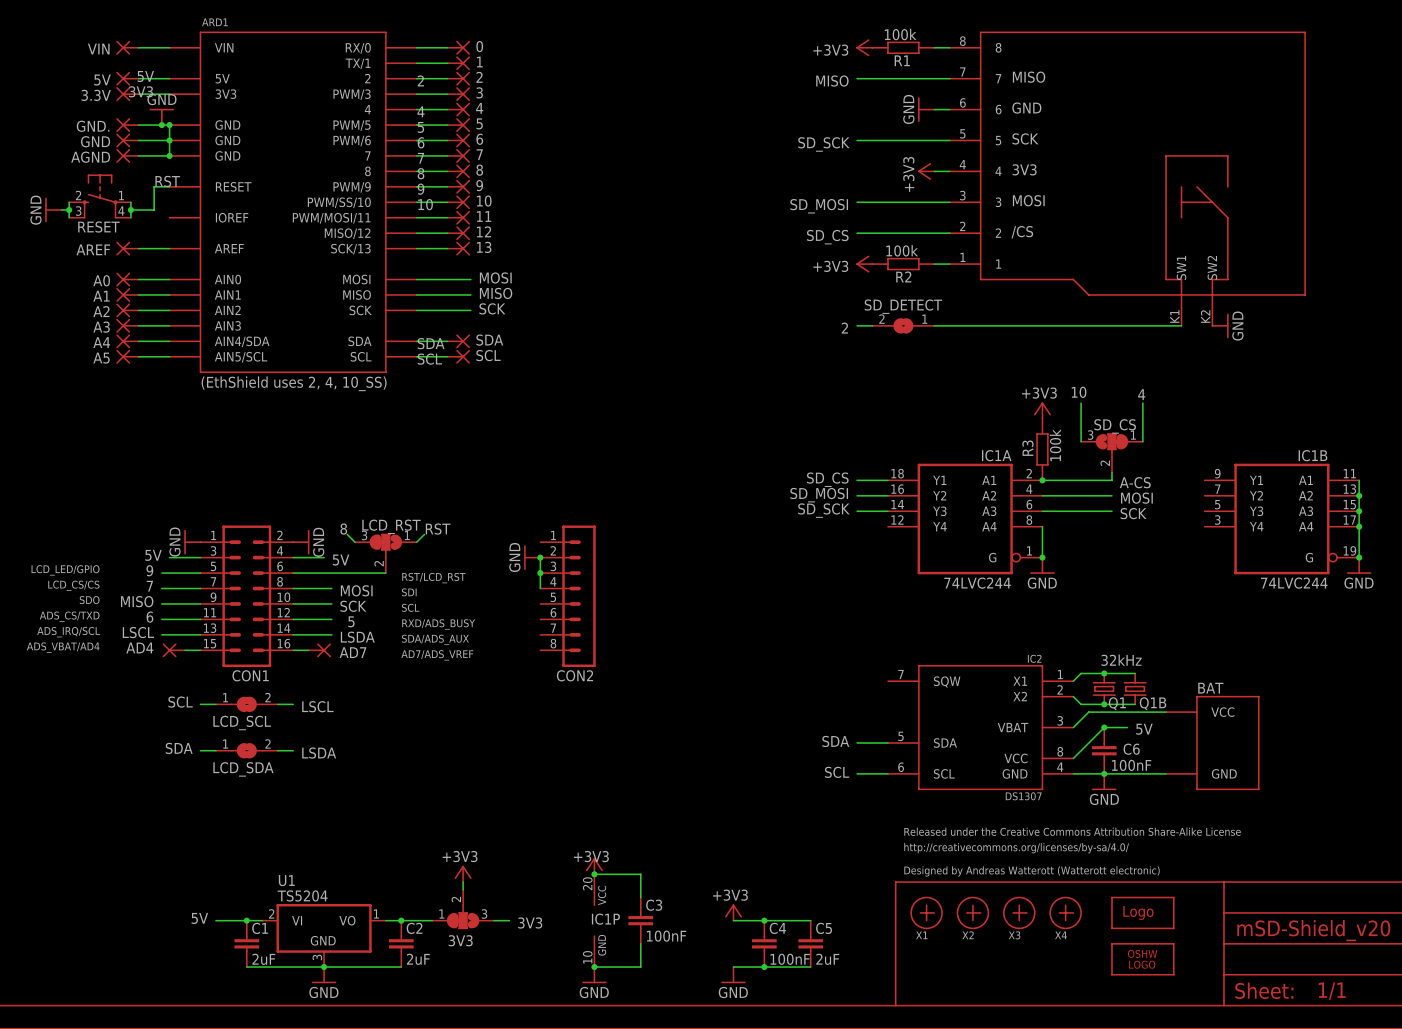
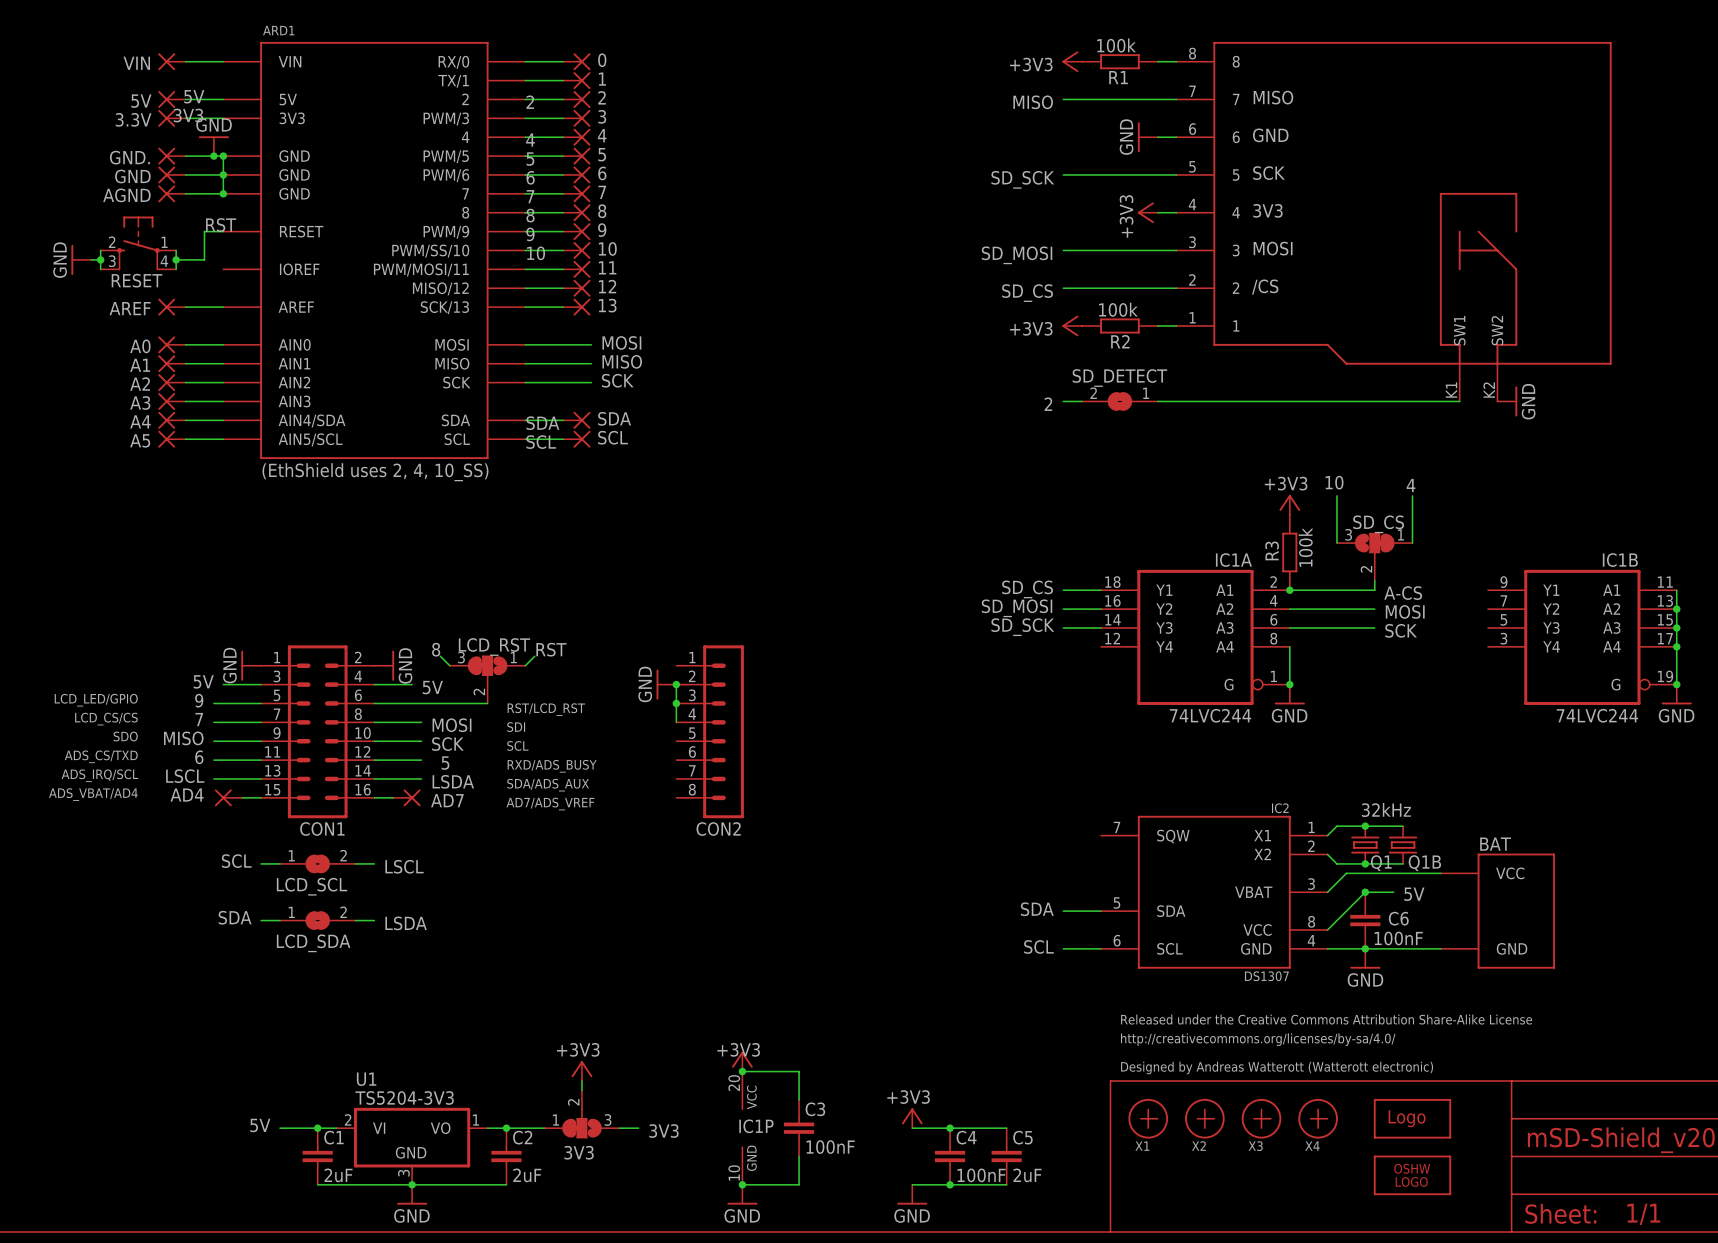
U1 value: TS5204 (302, 895) -> TS5204-3V3 (404, 1098)

